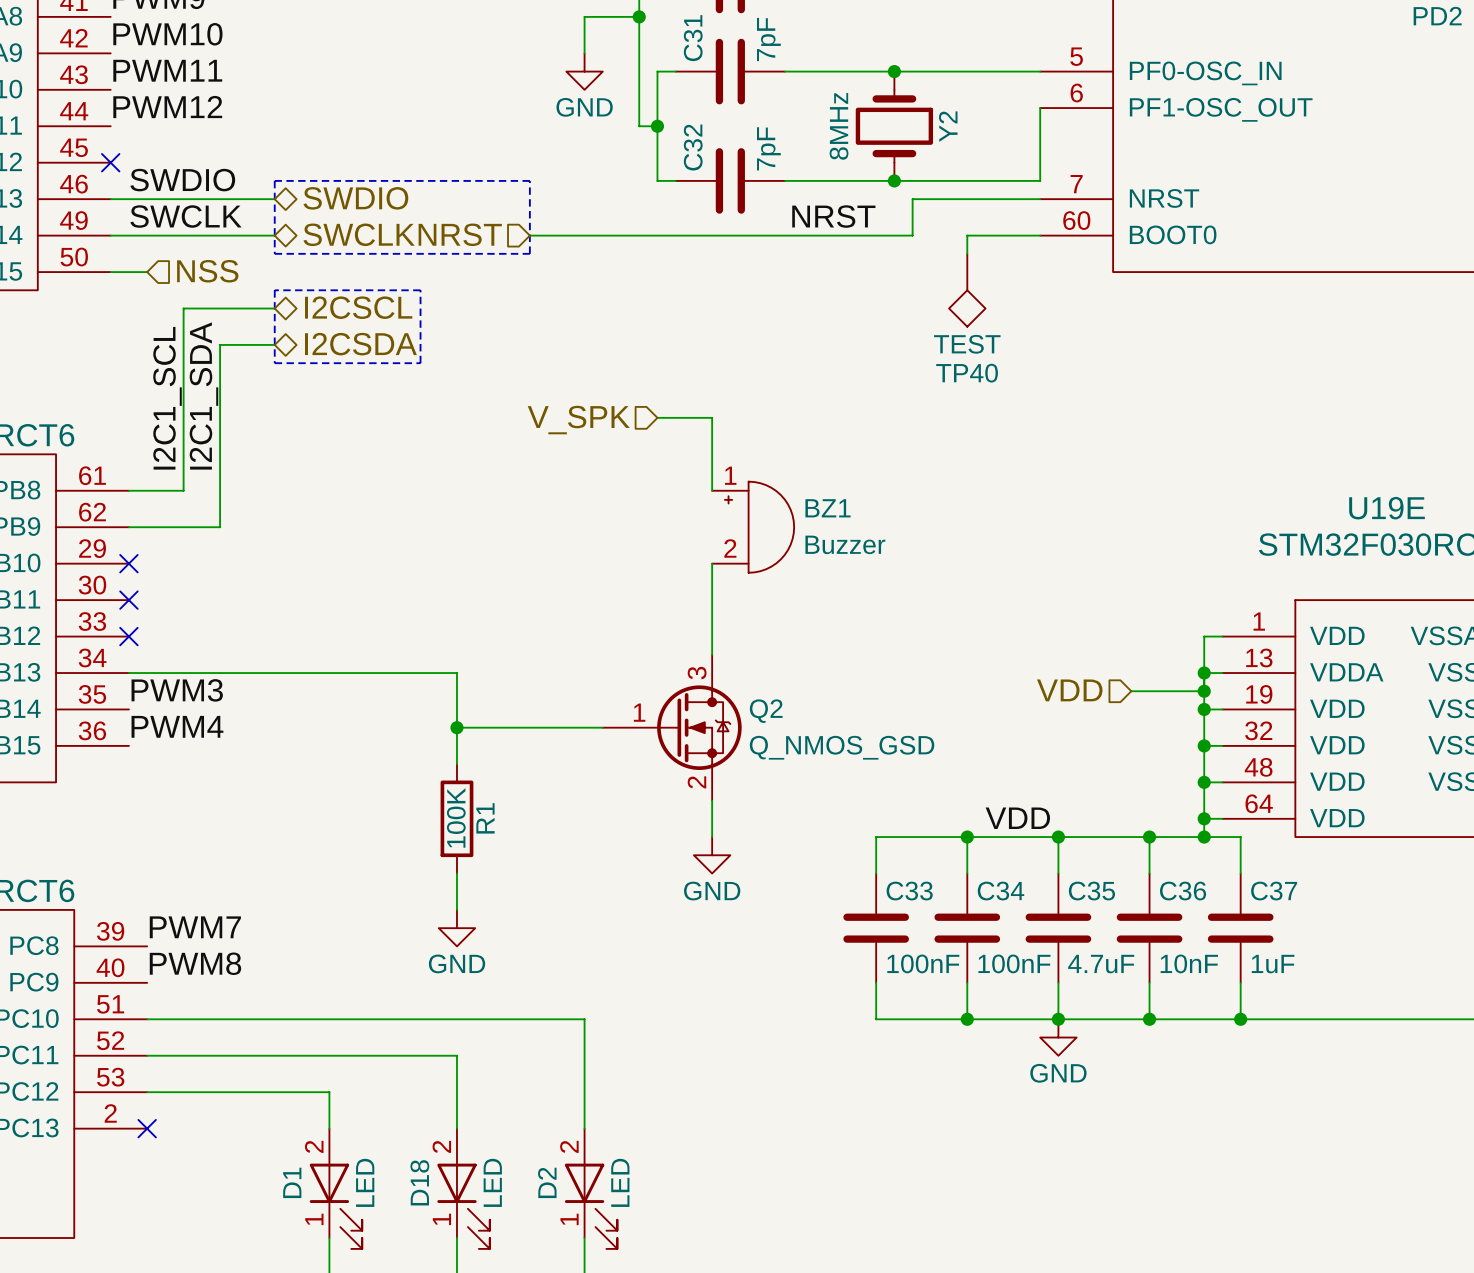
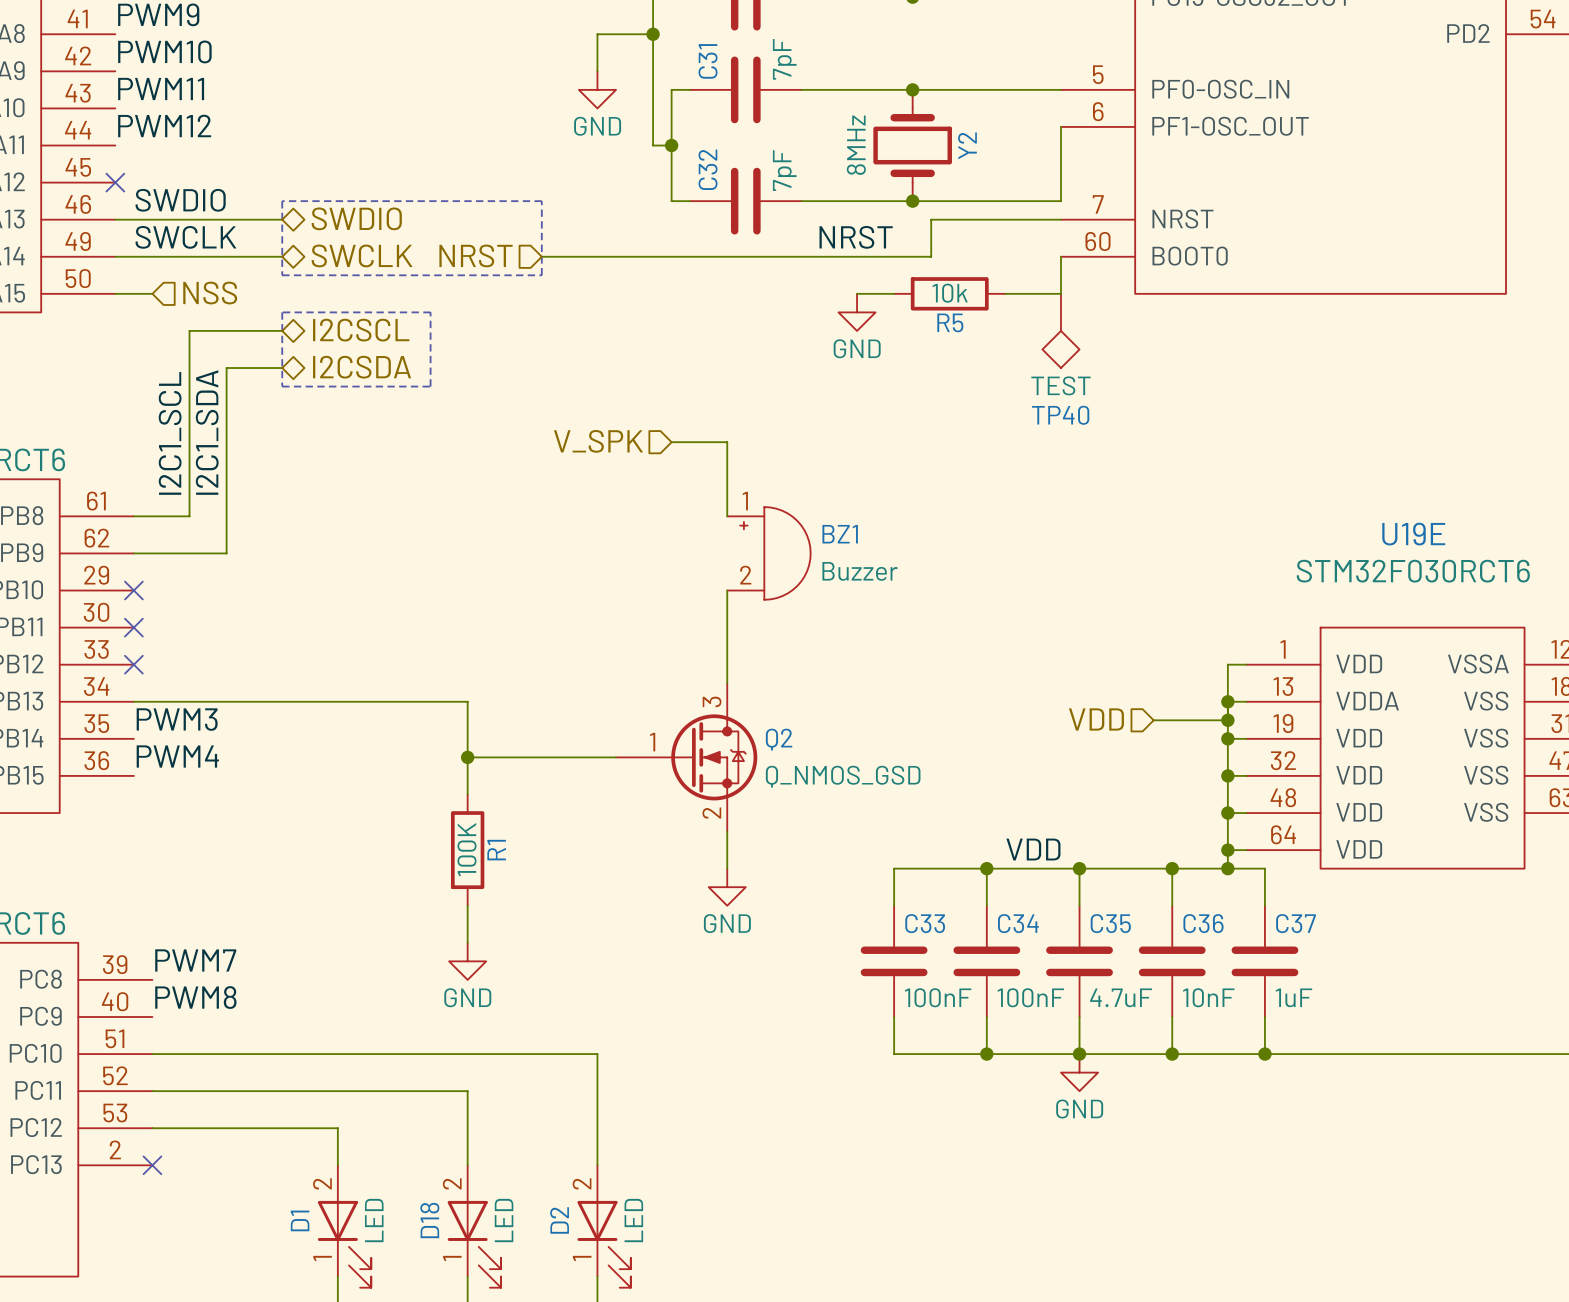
wire: (1040, 235) (967, 235) (967, 253) -> (1060, 256) (1060, 293) (1005, 293)
wire: none -> (857, 293) (894, 293)
R5: none -> 10k (949, 293)
power symbol: none -> GND (857, 312)
TP40 position: (967, 290) -> (1060, 330)

